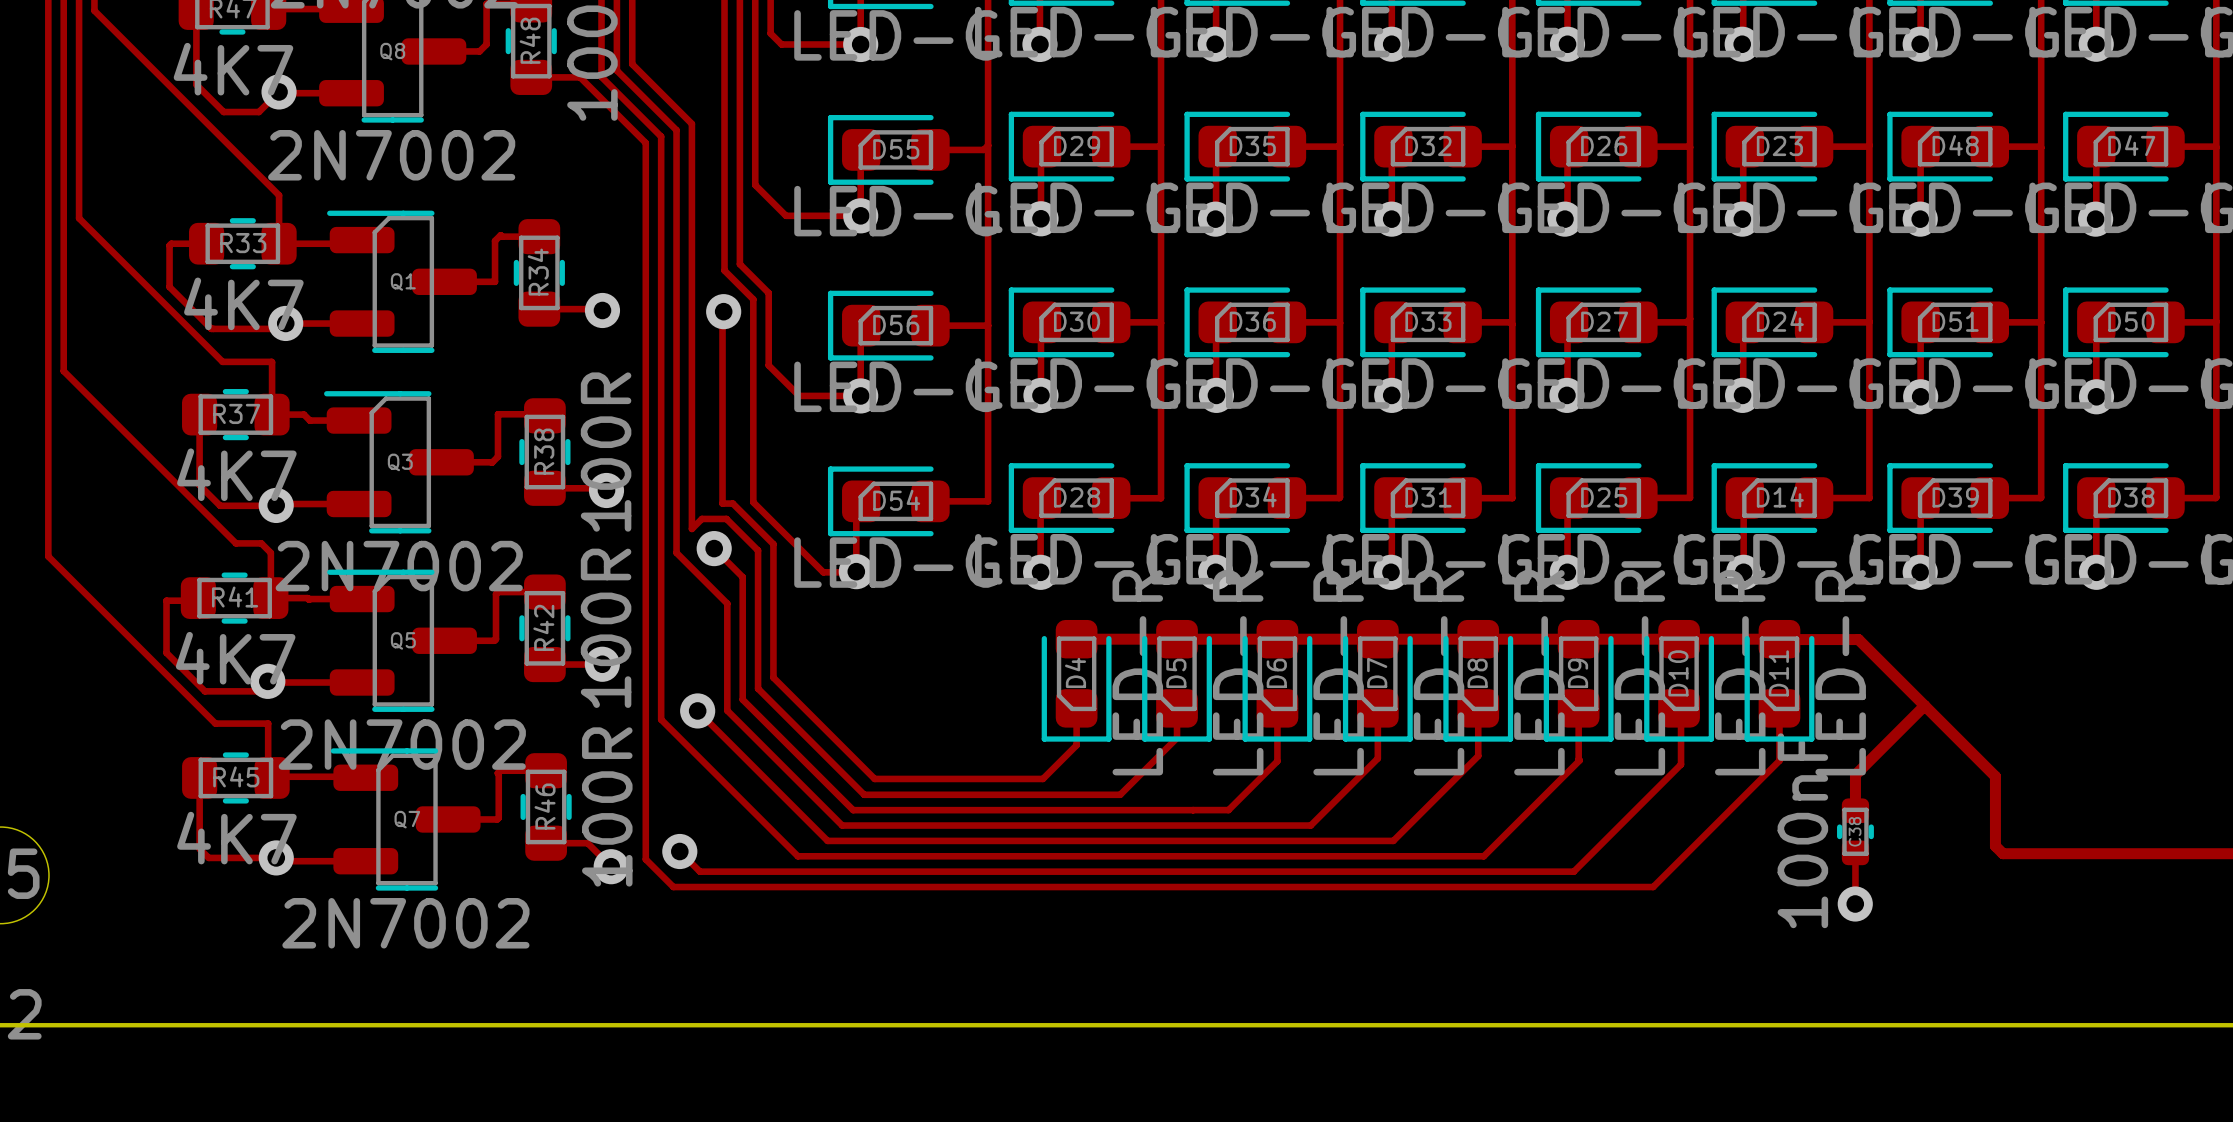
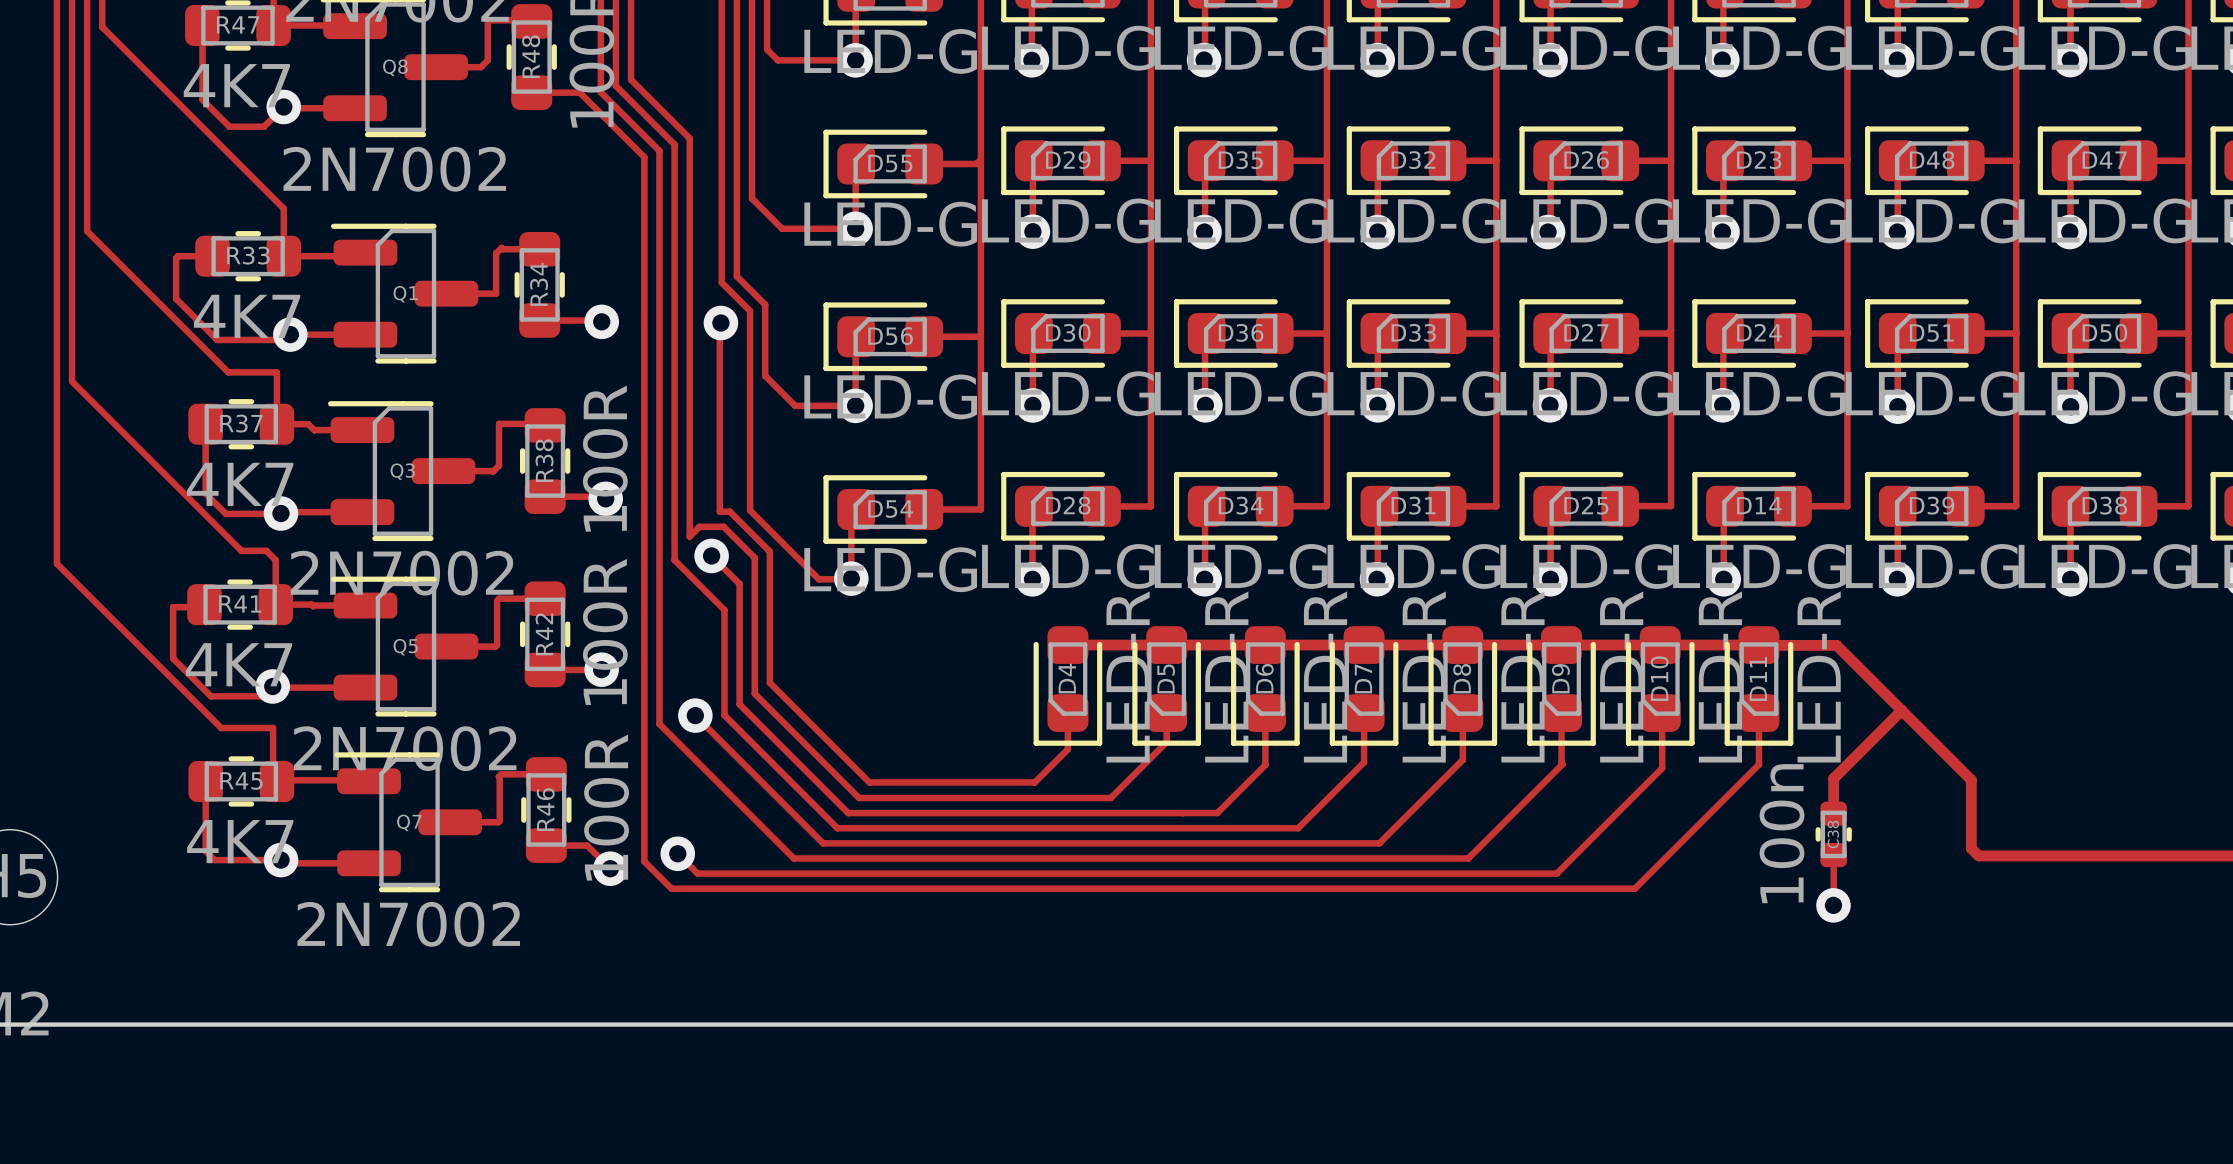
C38 value: 100nF (1802, 830) -> 100n (1782, 833)

